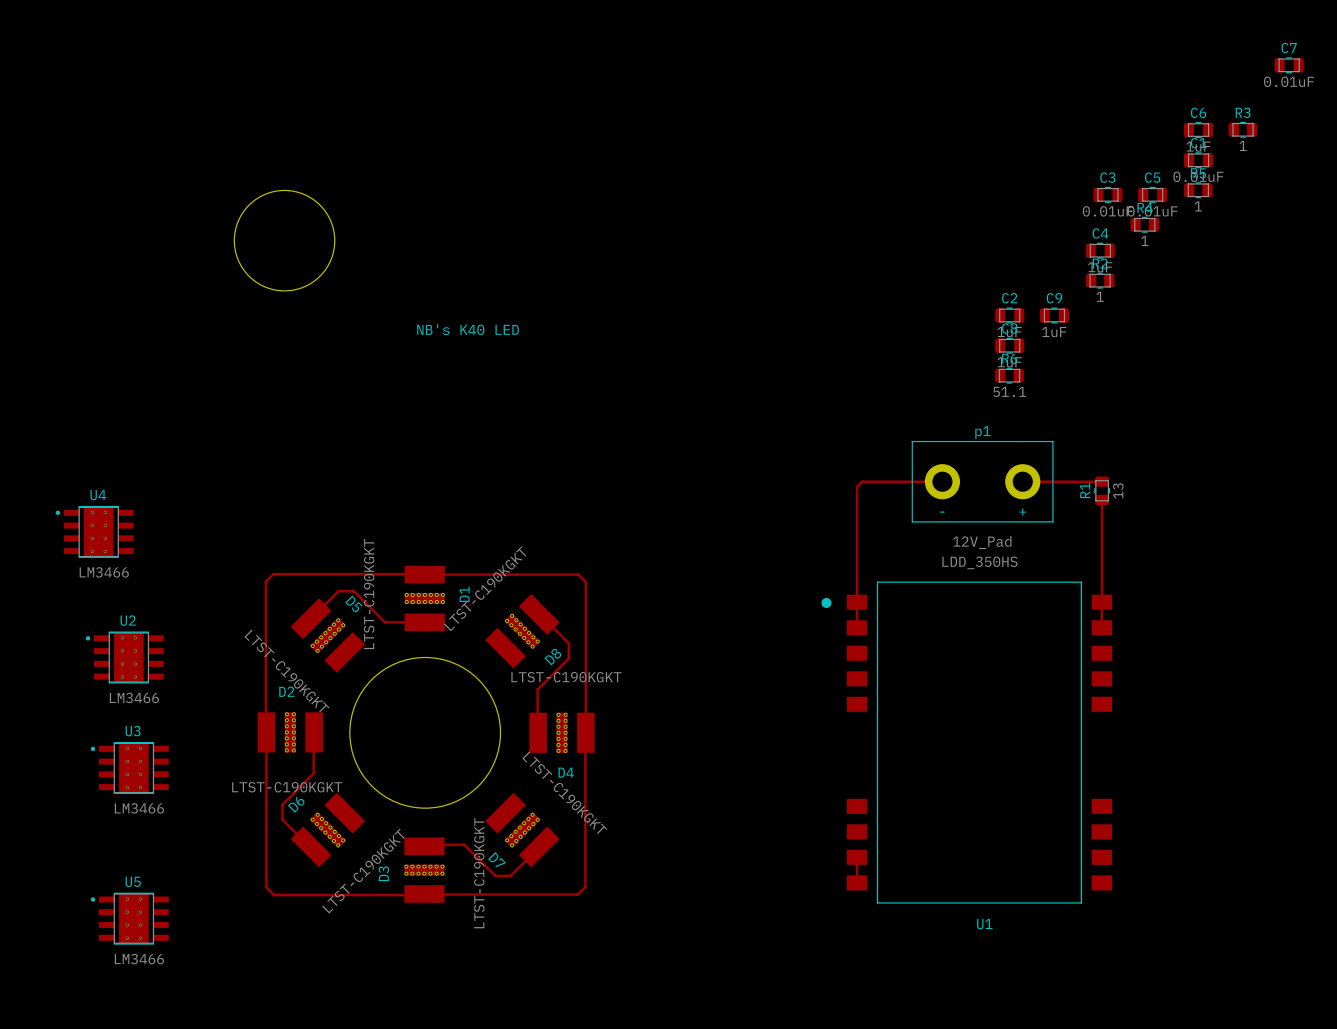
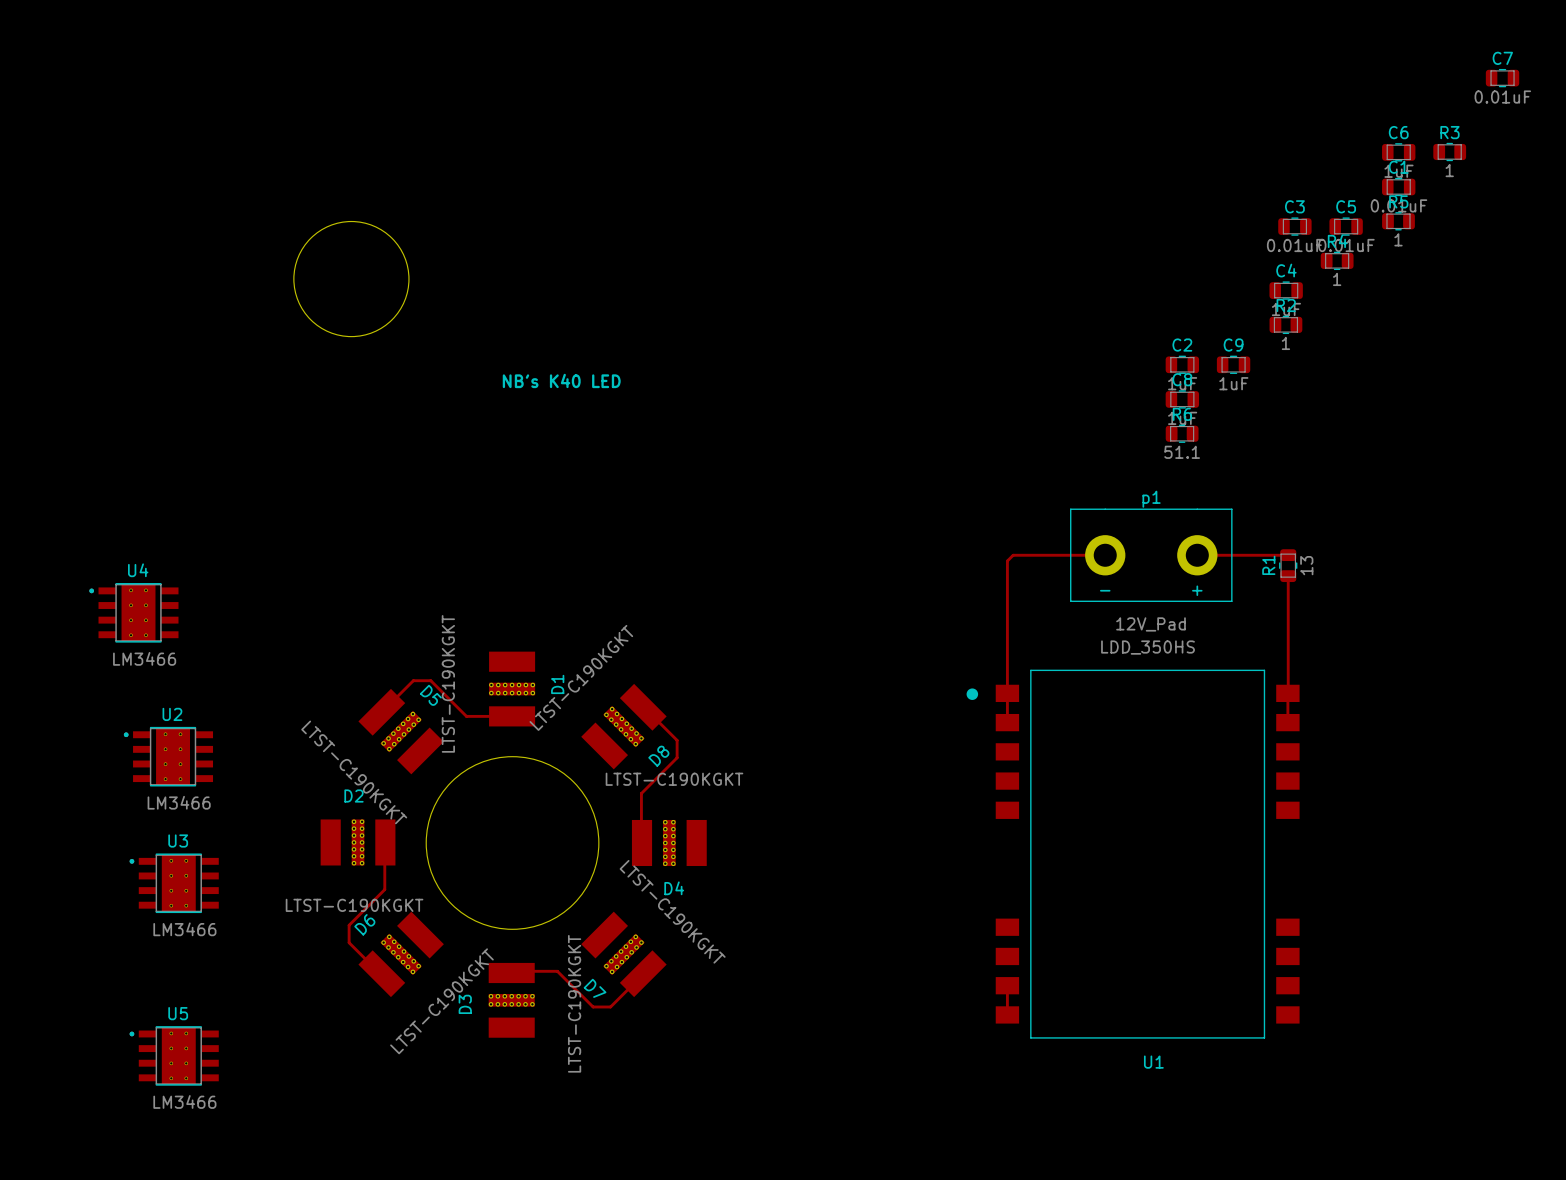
track: (424, 574) (273, 574) (265, 581) (265, 735) -> none
track: (424, 574) (578, 574) (585, 582) (585, 732) -> none
track: (585, 733) (585, 886) (577, 894) (427, 894) -> none
track: (266, 736) (266, 887) (274, 895) (427, 895) -> none

